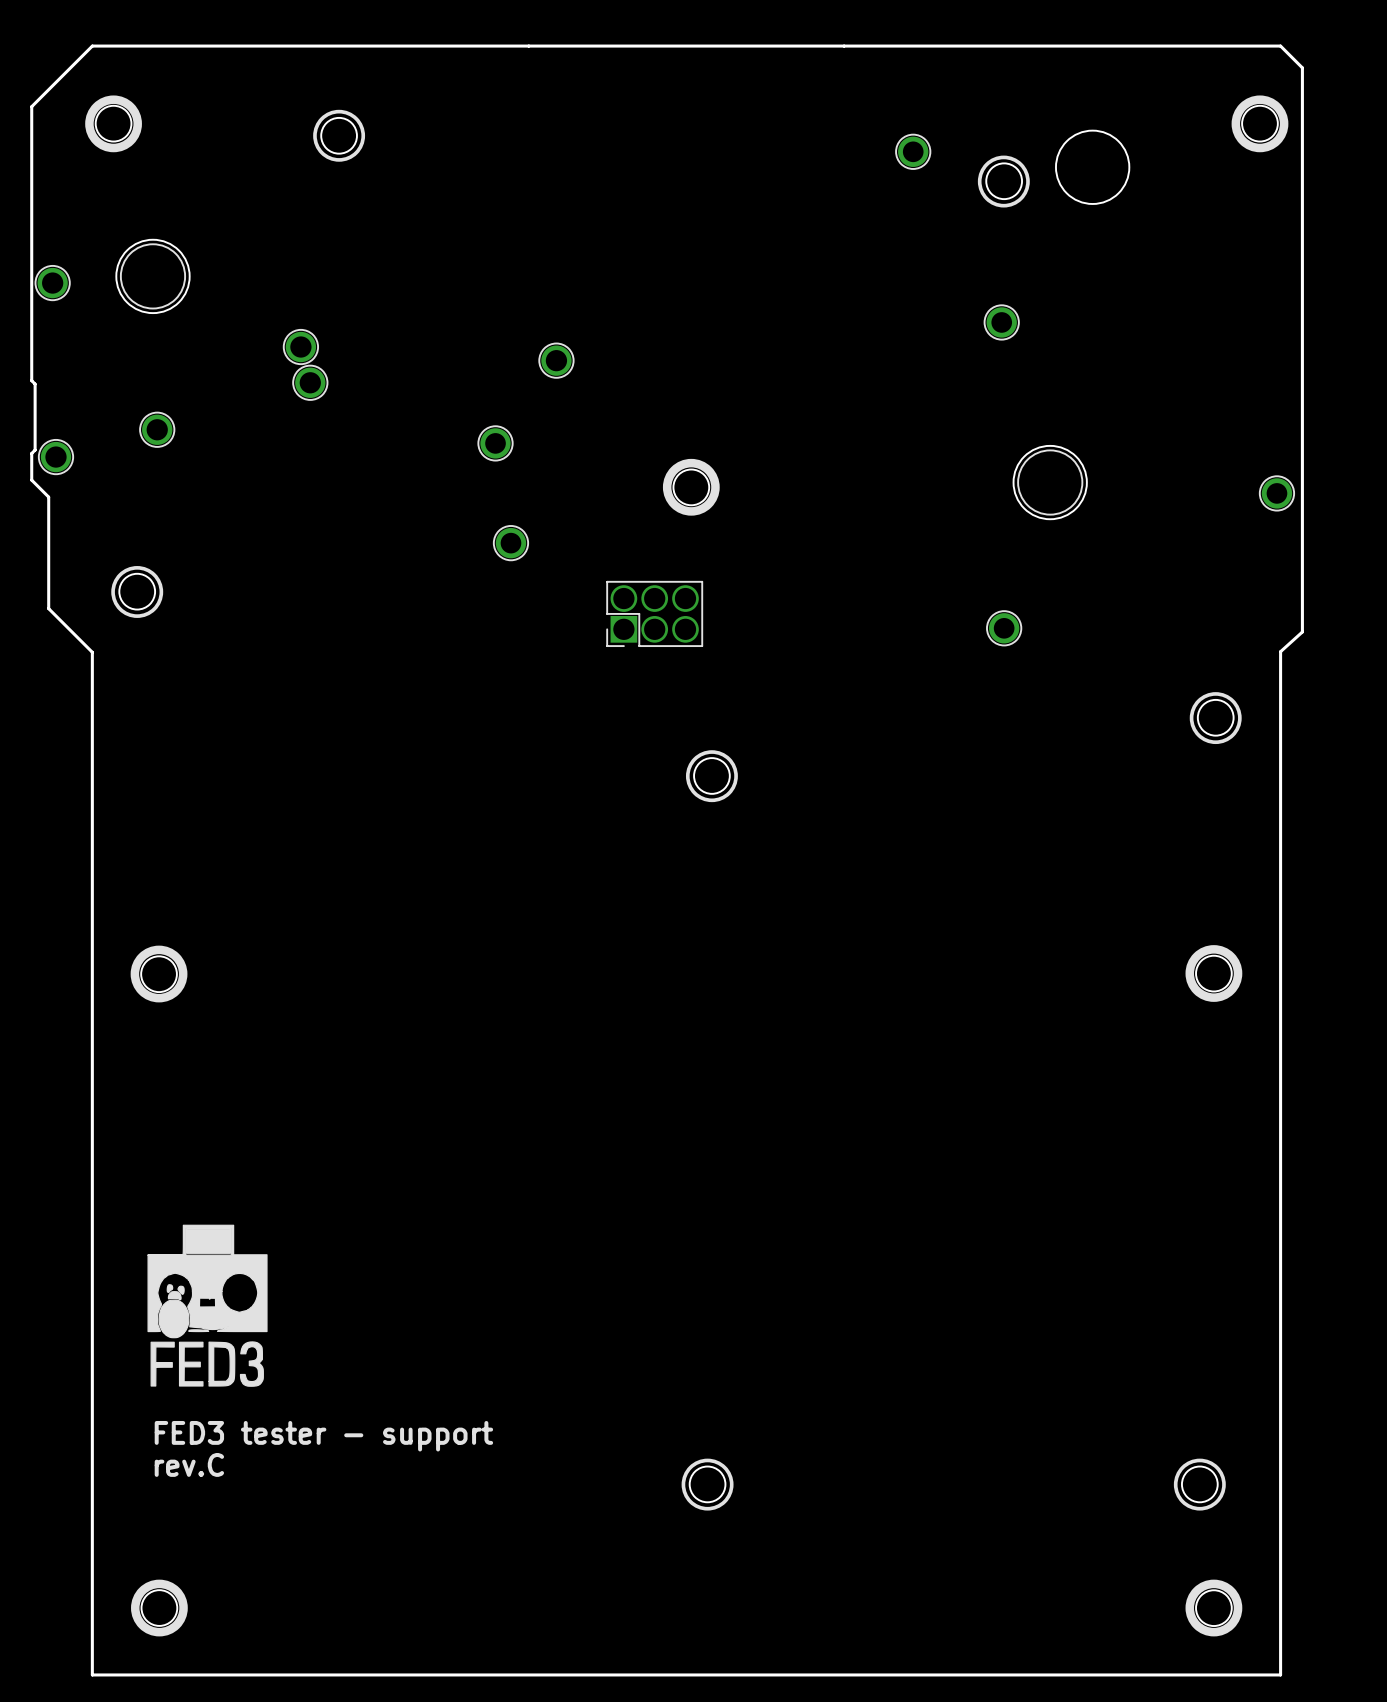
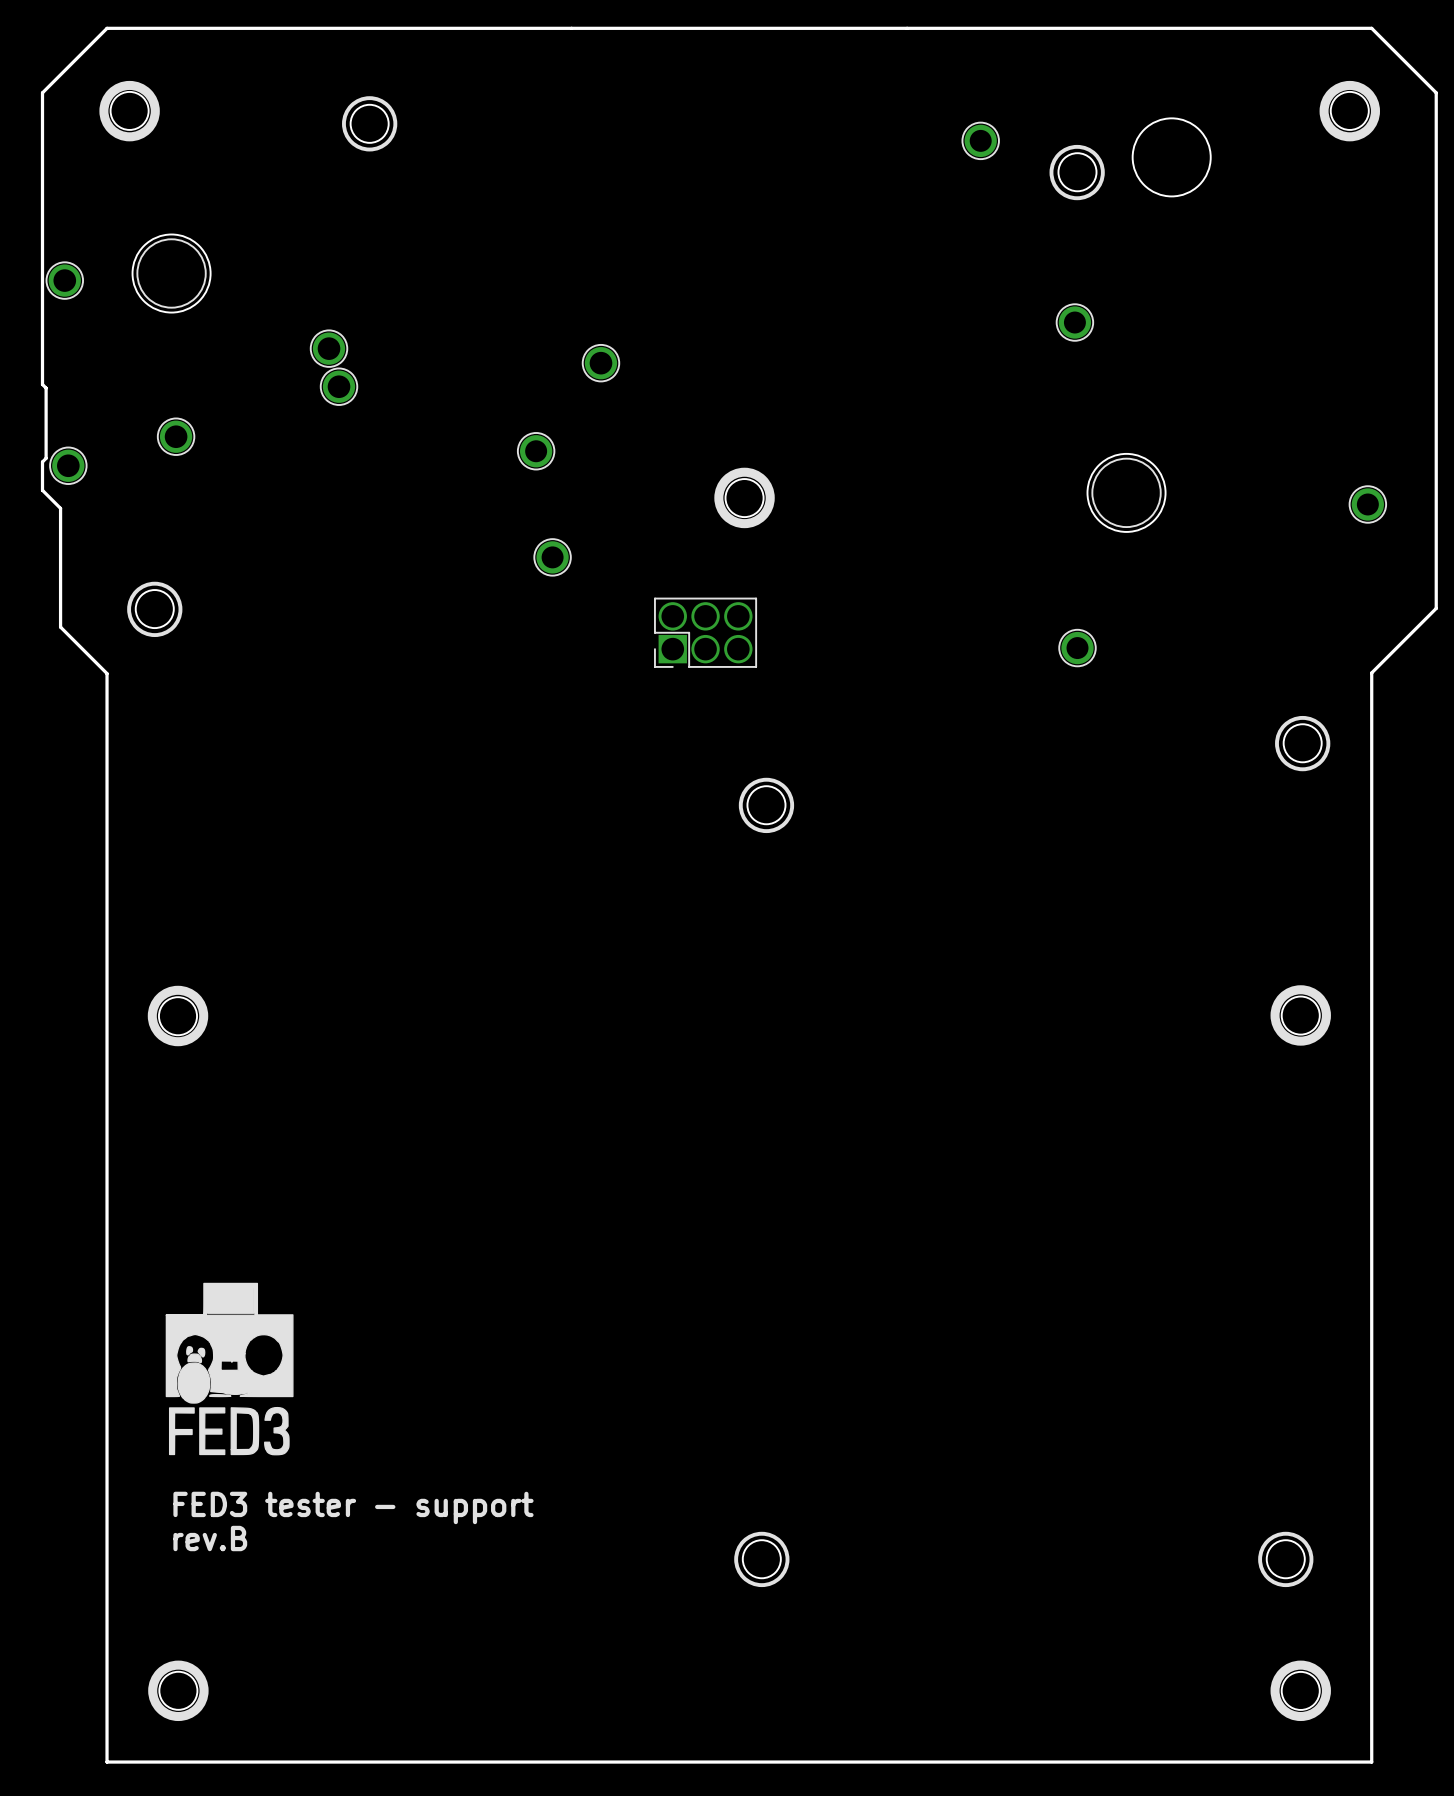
board edge: (1302, 67) (1302, 631) (1280, 651) -> (1394, 51) (1436, 92) (1436, 608) (1371, 672)
text: rev.C (189, 1464) -> rev.B (210, 1538)

